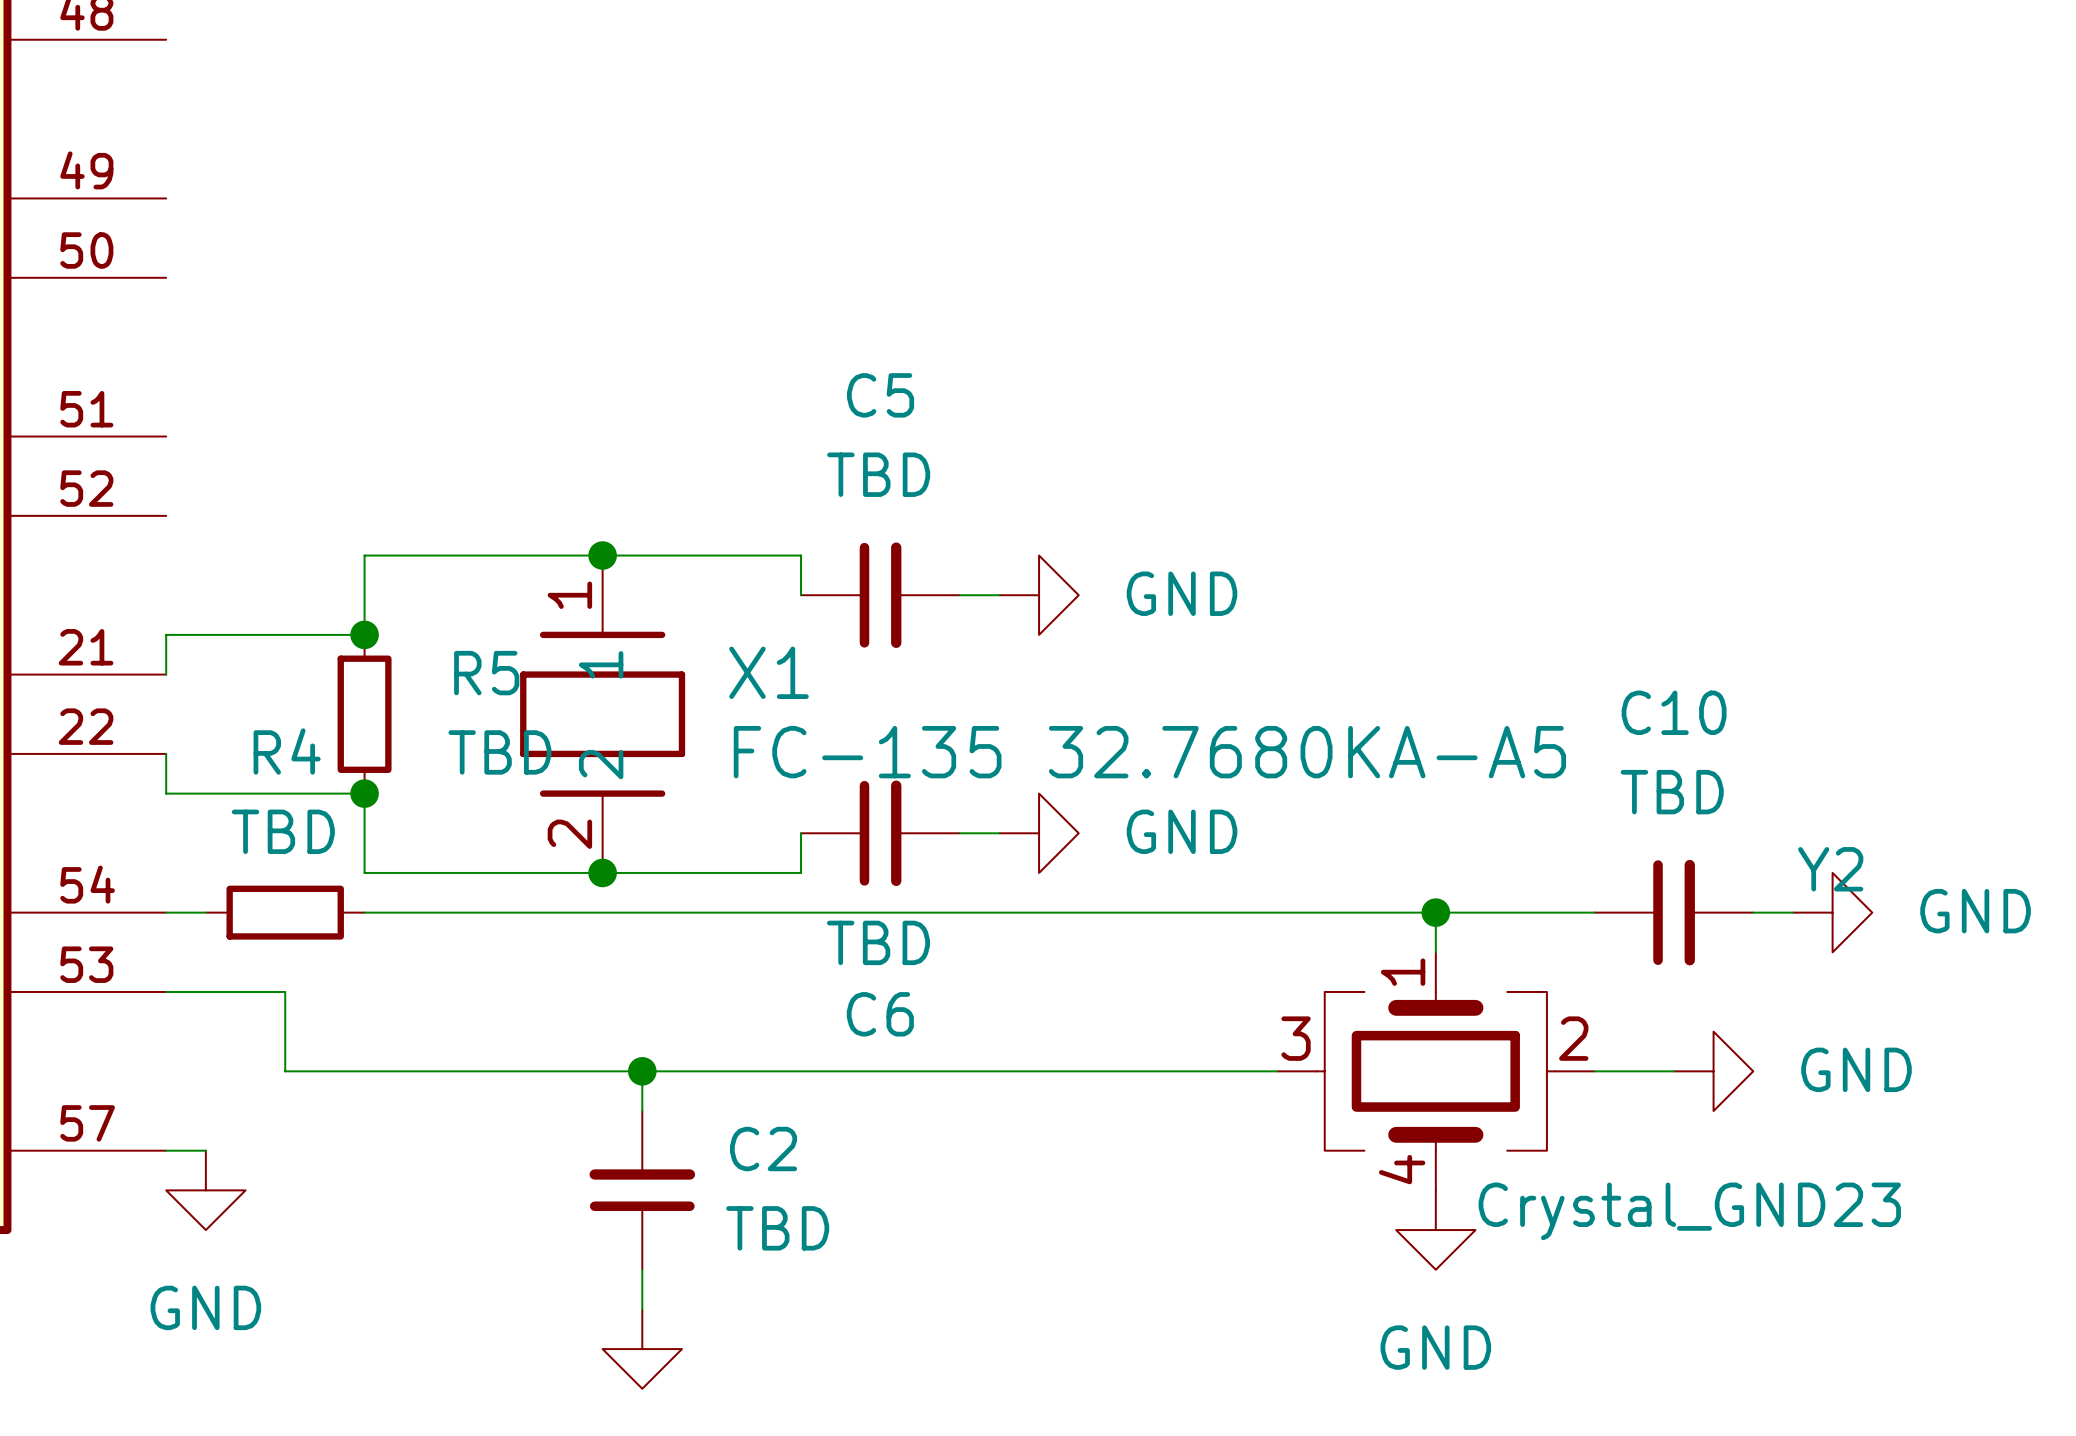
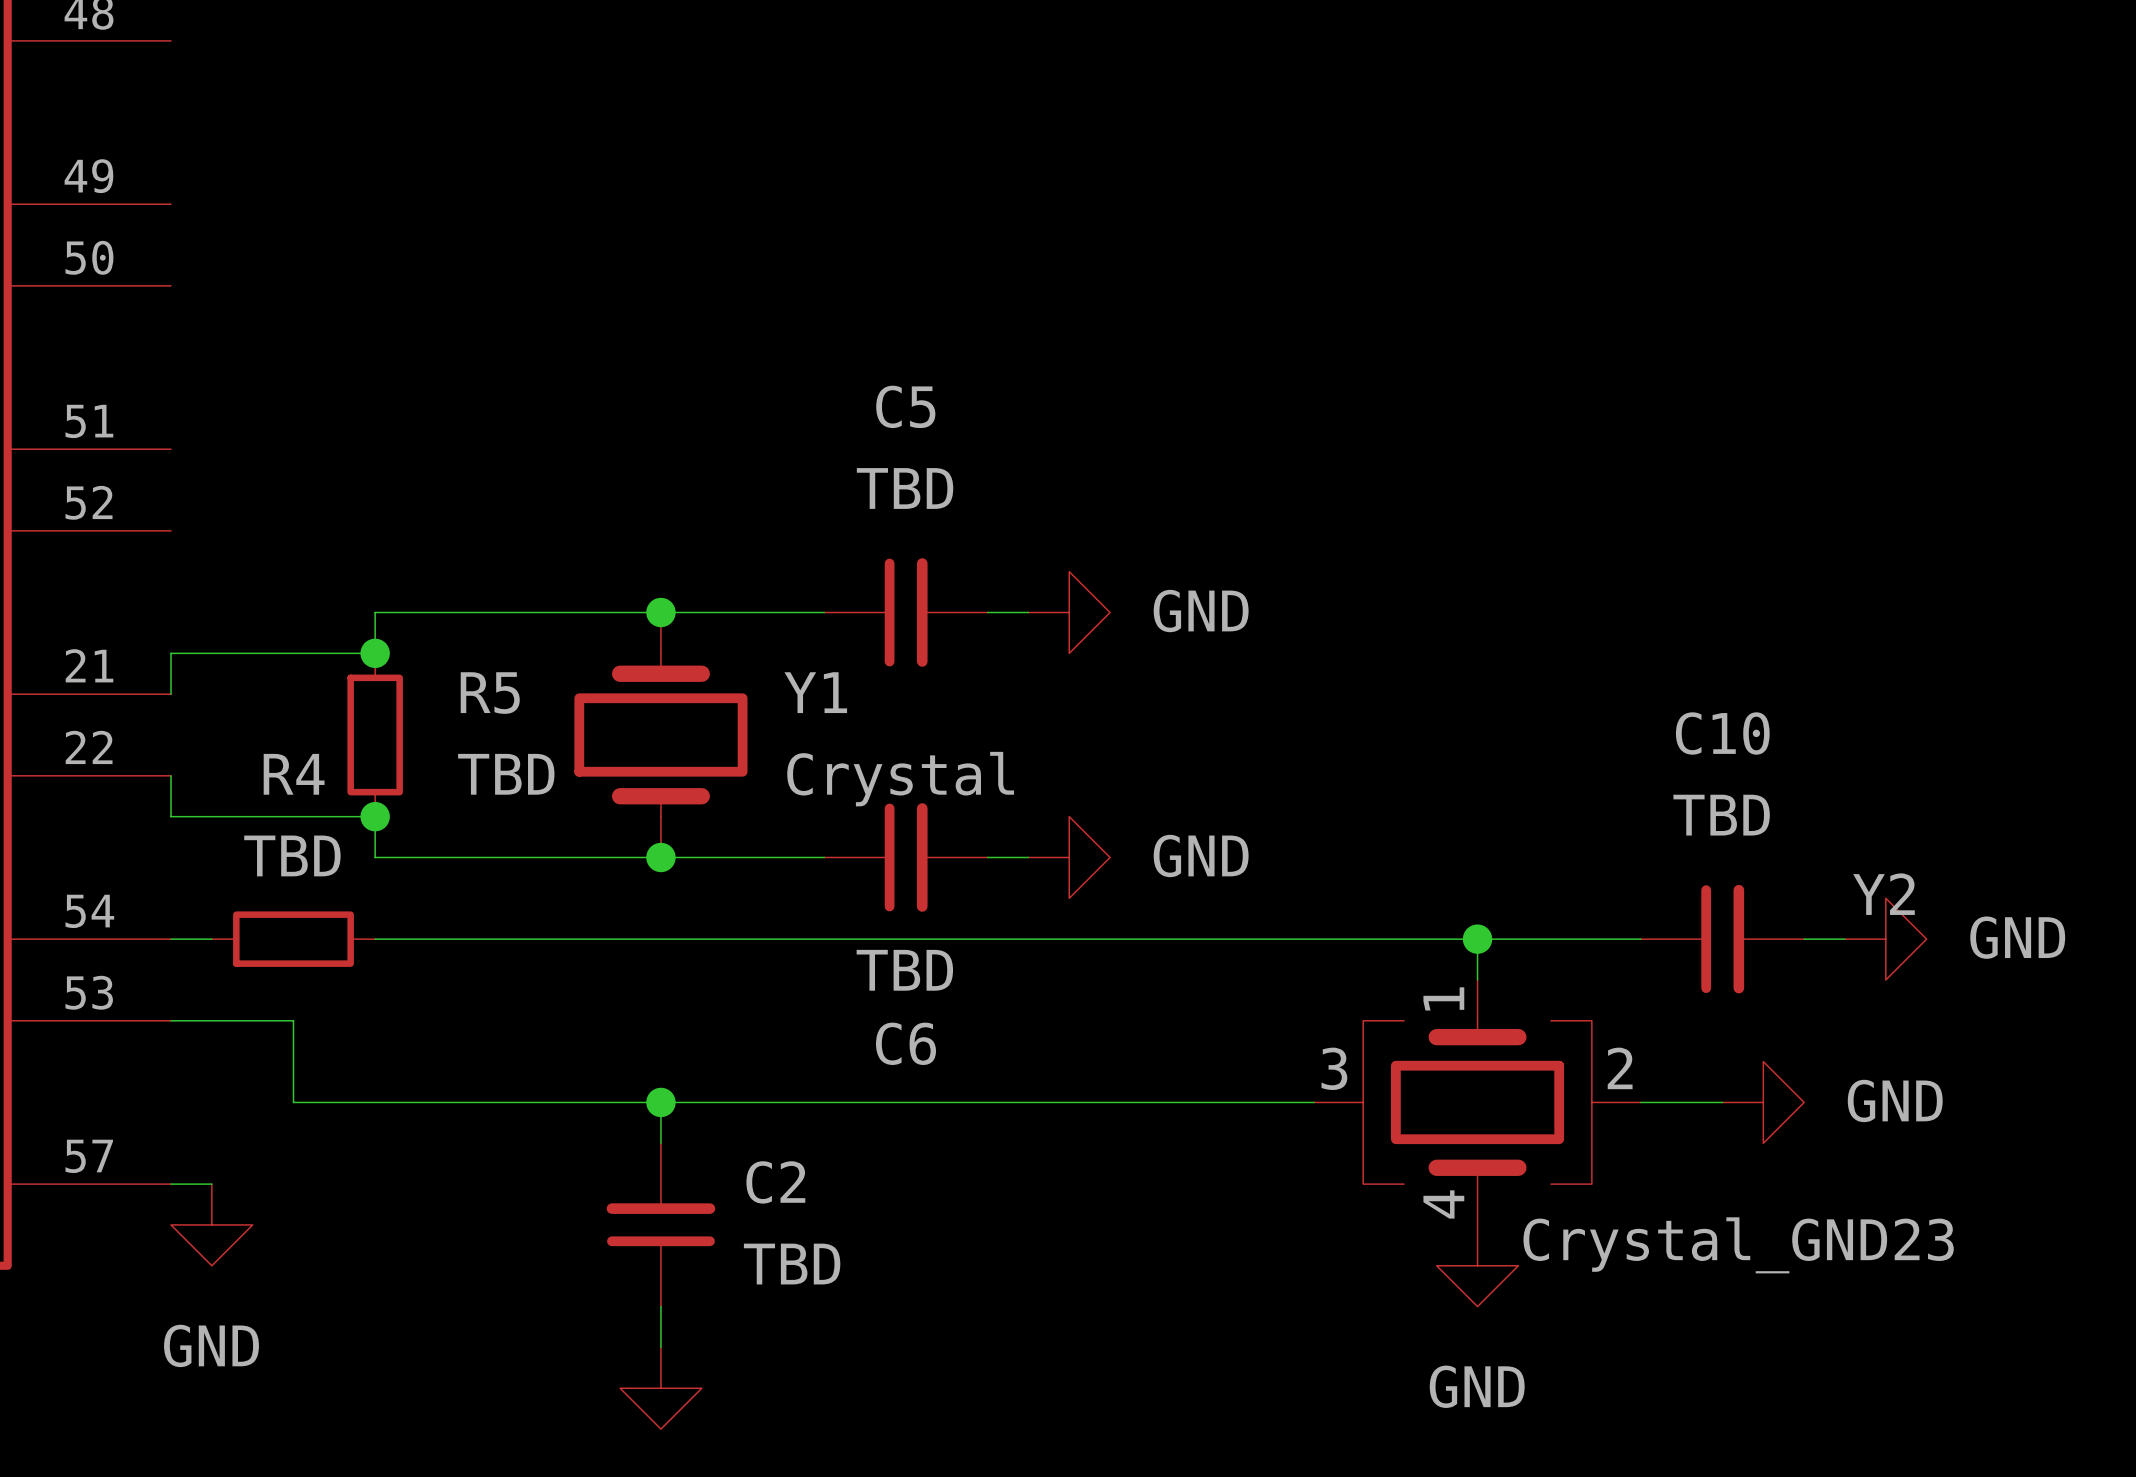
junction position: (602, 555) -> (660, 612)
wire: (364, 595) (364, 555) (801, 555) (801, 595) -> (375, 612) (824, 612)
X1: FC-135 32.7680KA-A5 (602, 714) -> none
Y1: none -> Crystal (660, 735)
wire: (364, 833) (364, 872) (801, 872) (801, 833) -> (375, 857) (824, 857)
junction position: (602, 872) -> (660, 857)

